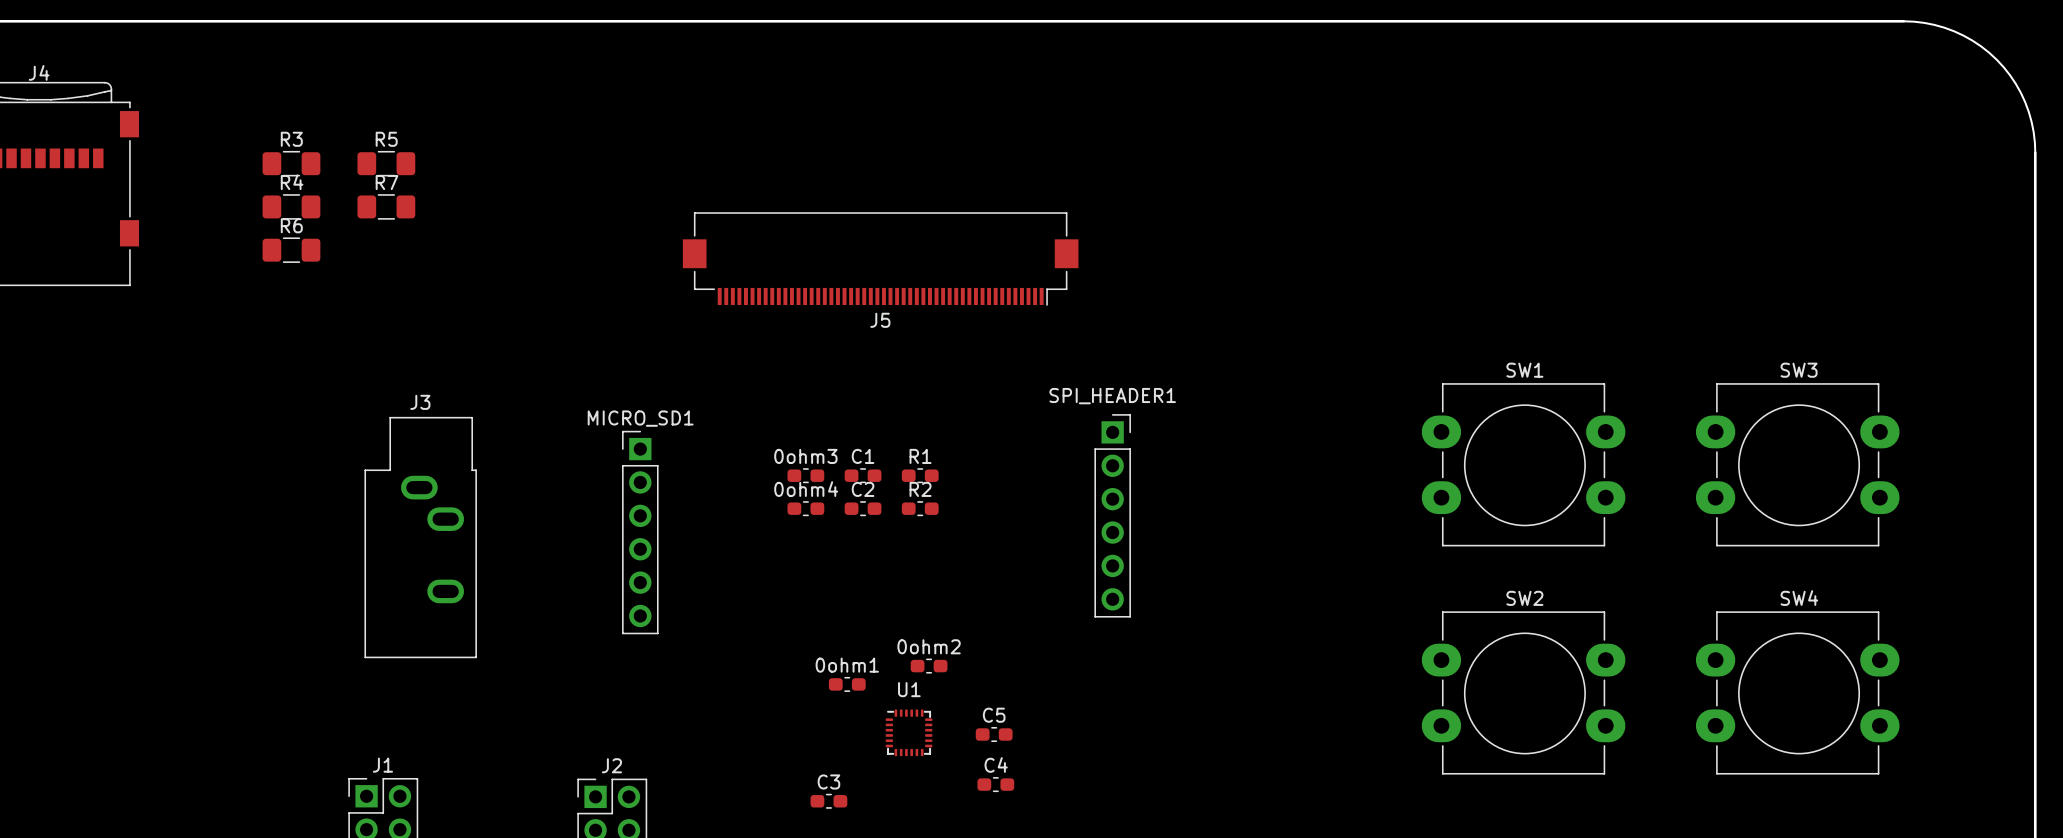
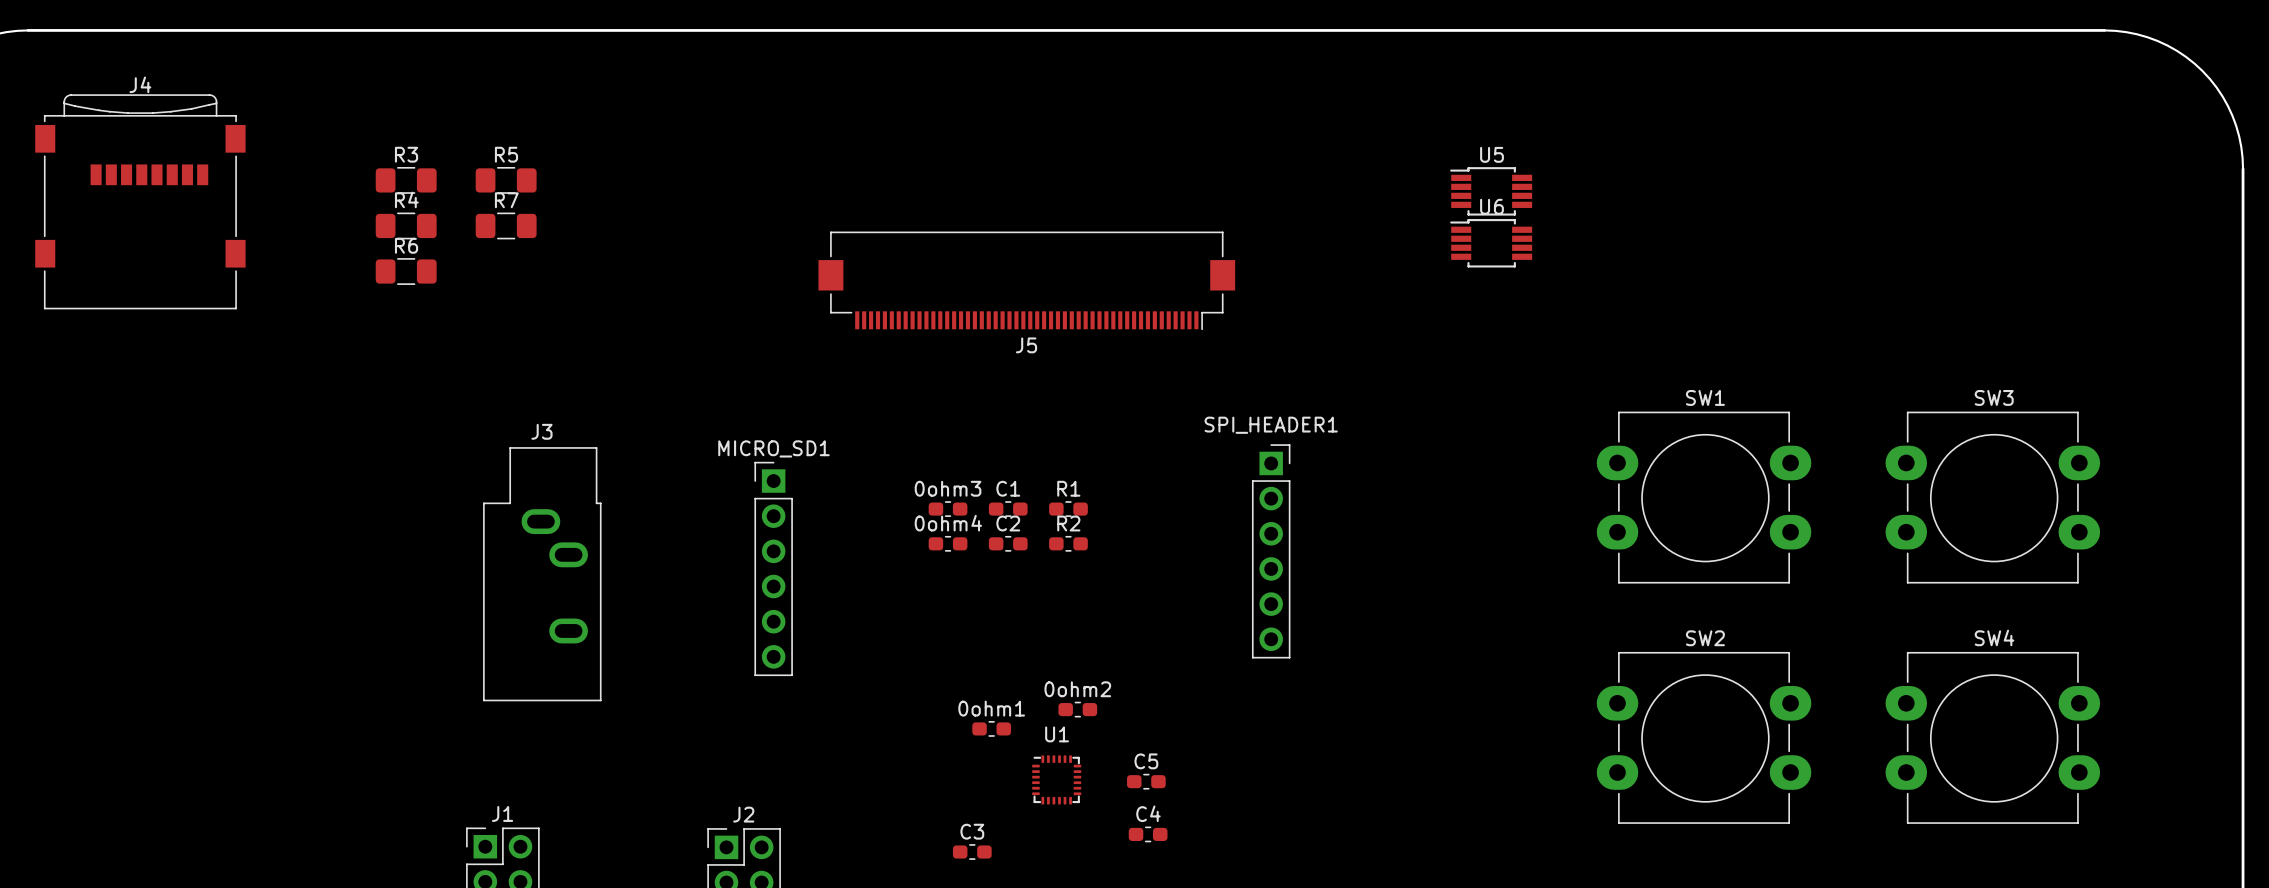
U5: none -> (1491, 191)
U6: none -> (1491, 243)

